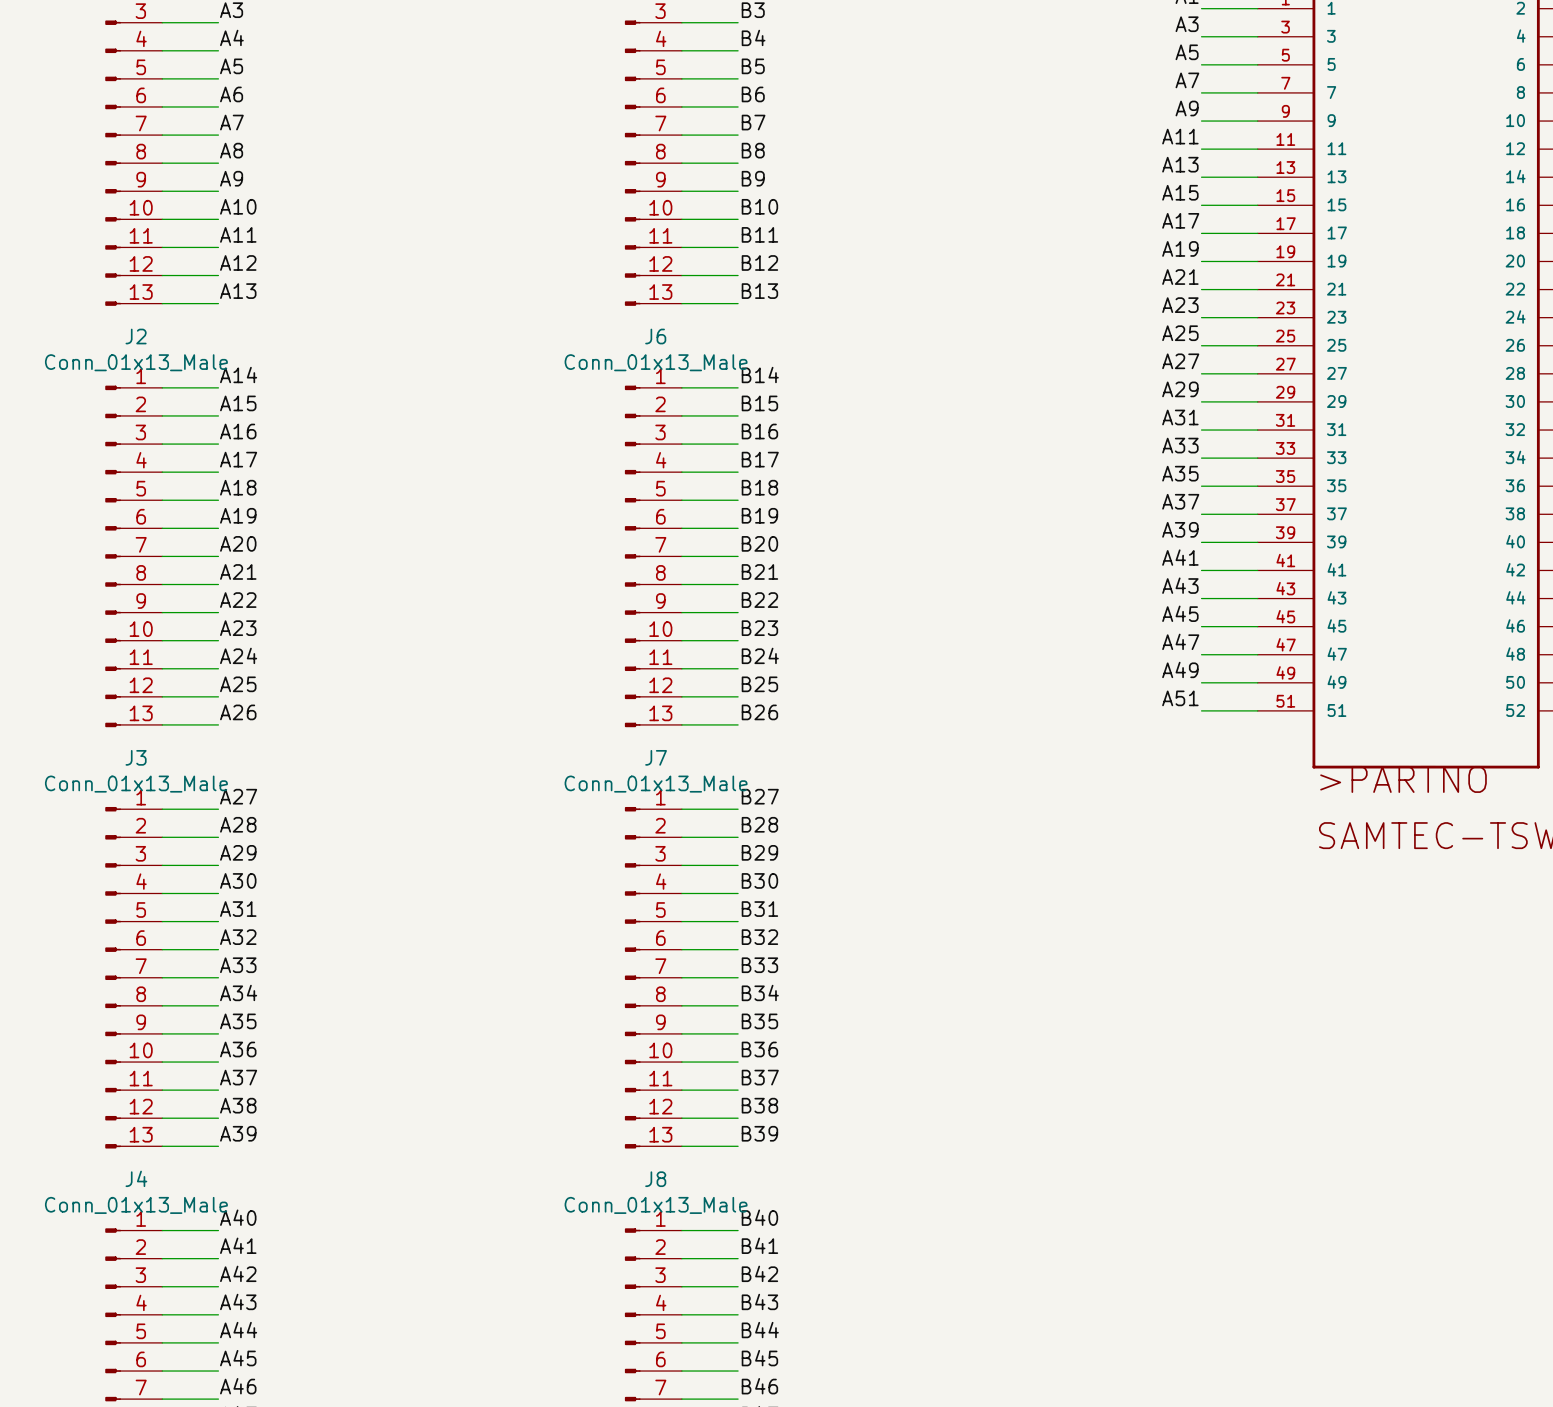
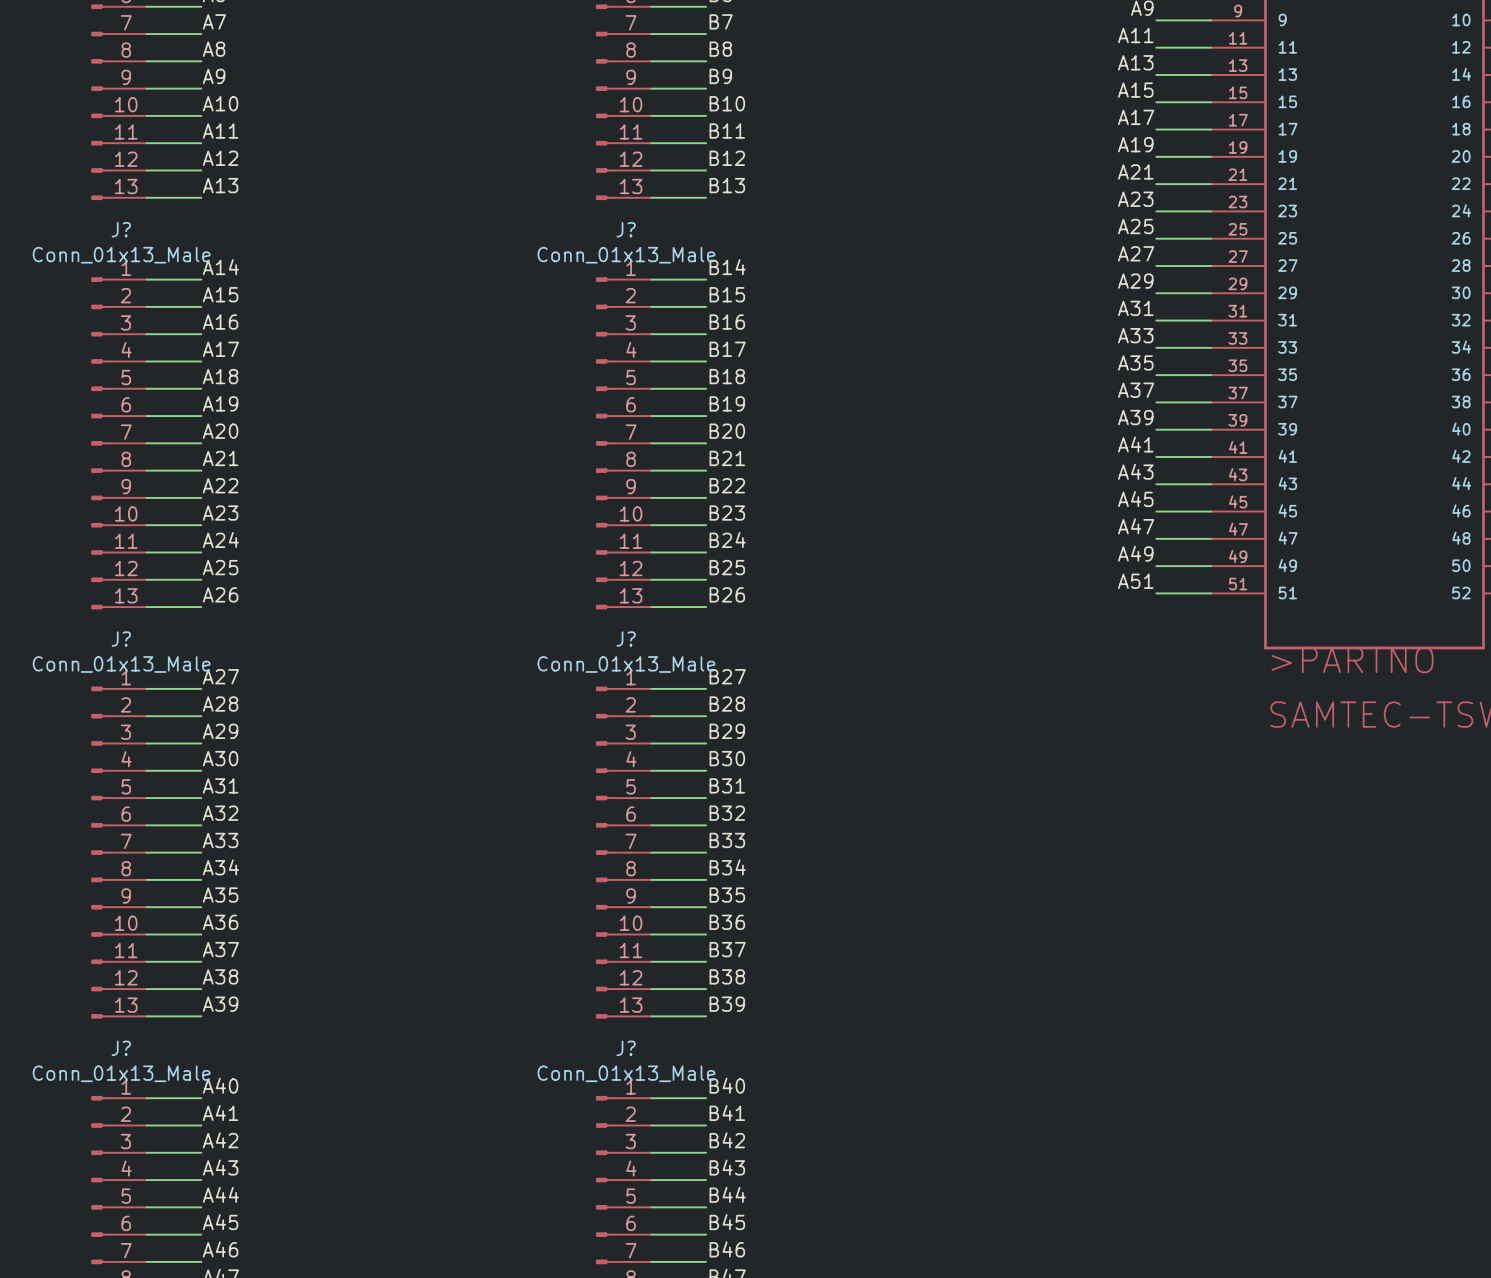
J2 name: J2 (136, 336) -> J? (121, 229)
J6 name: J6 (655, 336) -> J? (626, 229)
J3 name: J3 (136, 757) -> J? (121, 639)
J7 name: J7 (656, 757) -> J? (626, 639)
J4 name: J4 (136, 1178) -> J? (121, 1048)
J8 name: J8 (655, 1179) -> J? (626, 1048)

